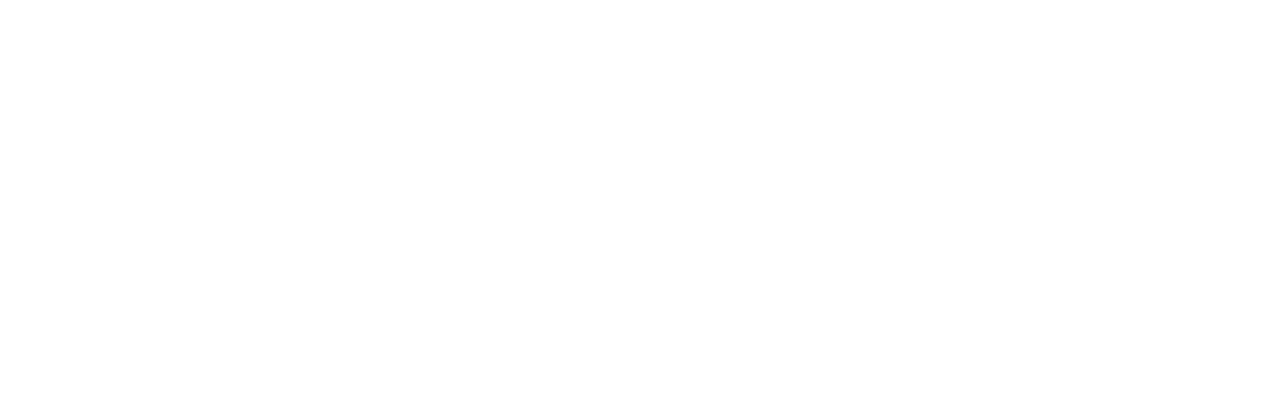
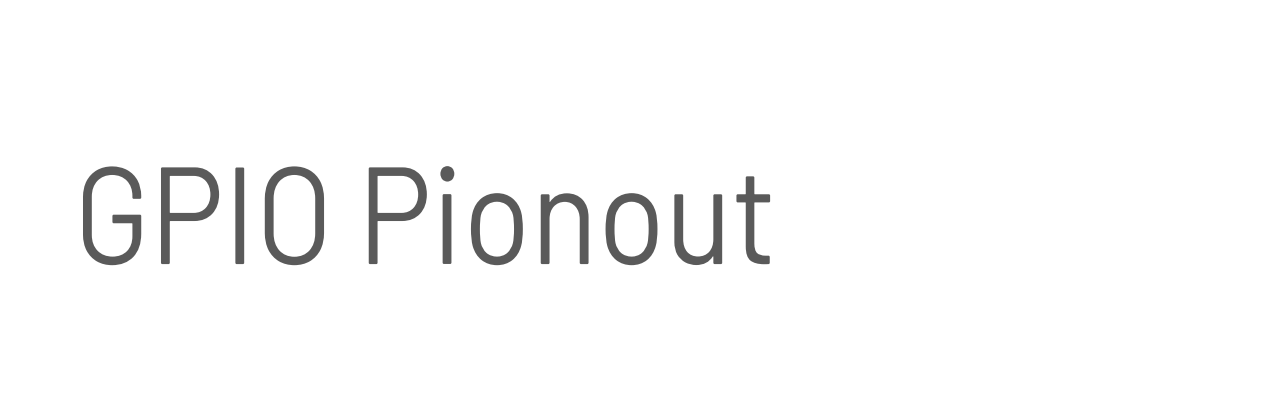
text: none -> GPIO Pionout (426, 215)

